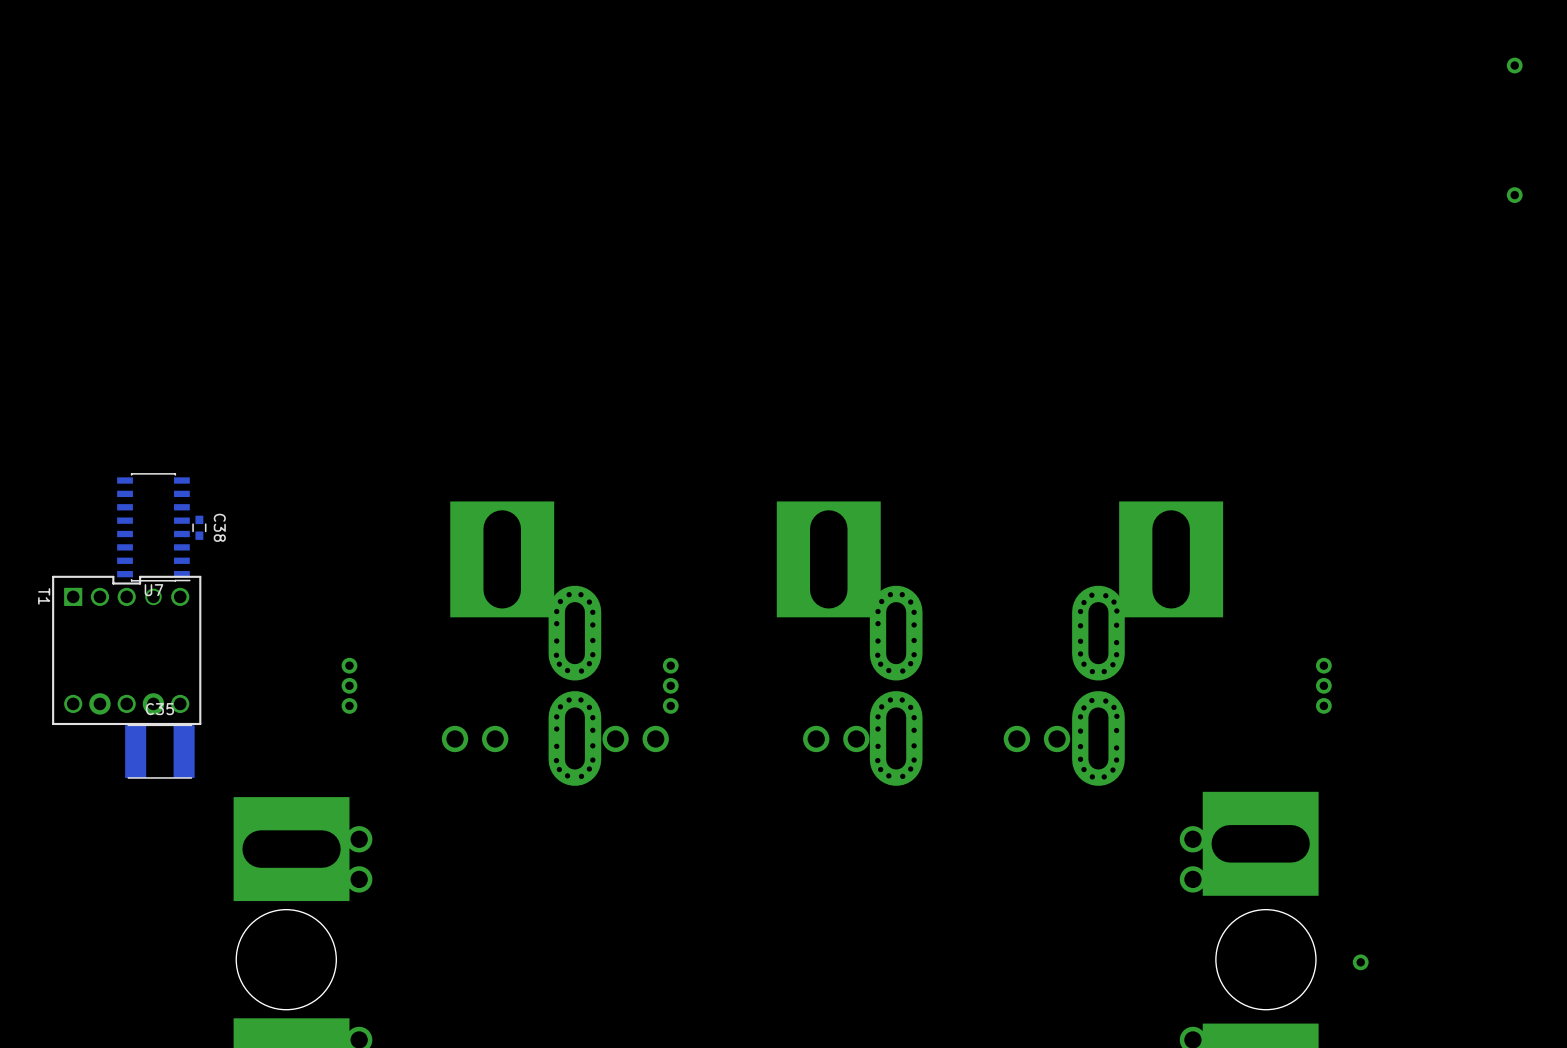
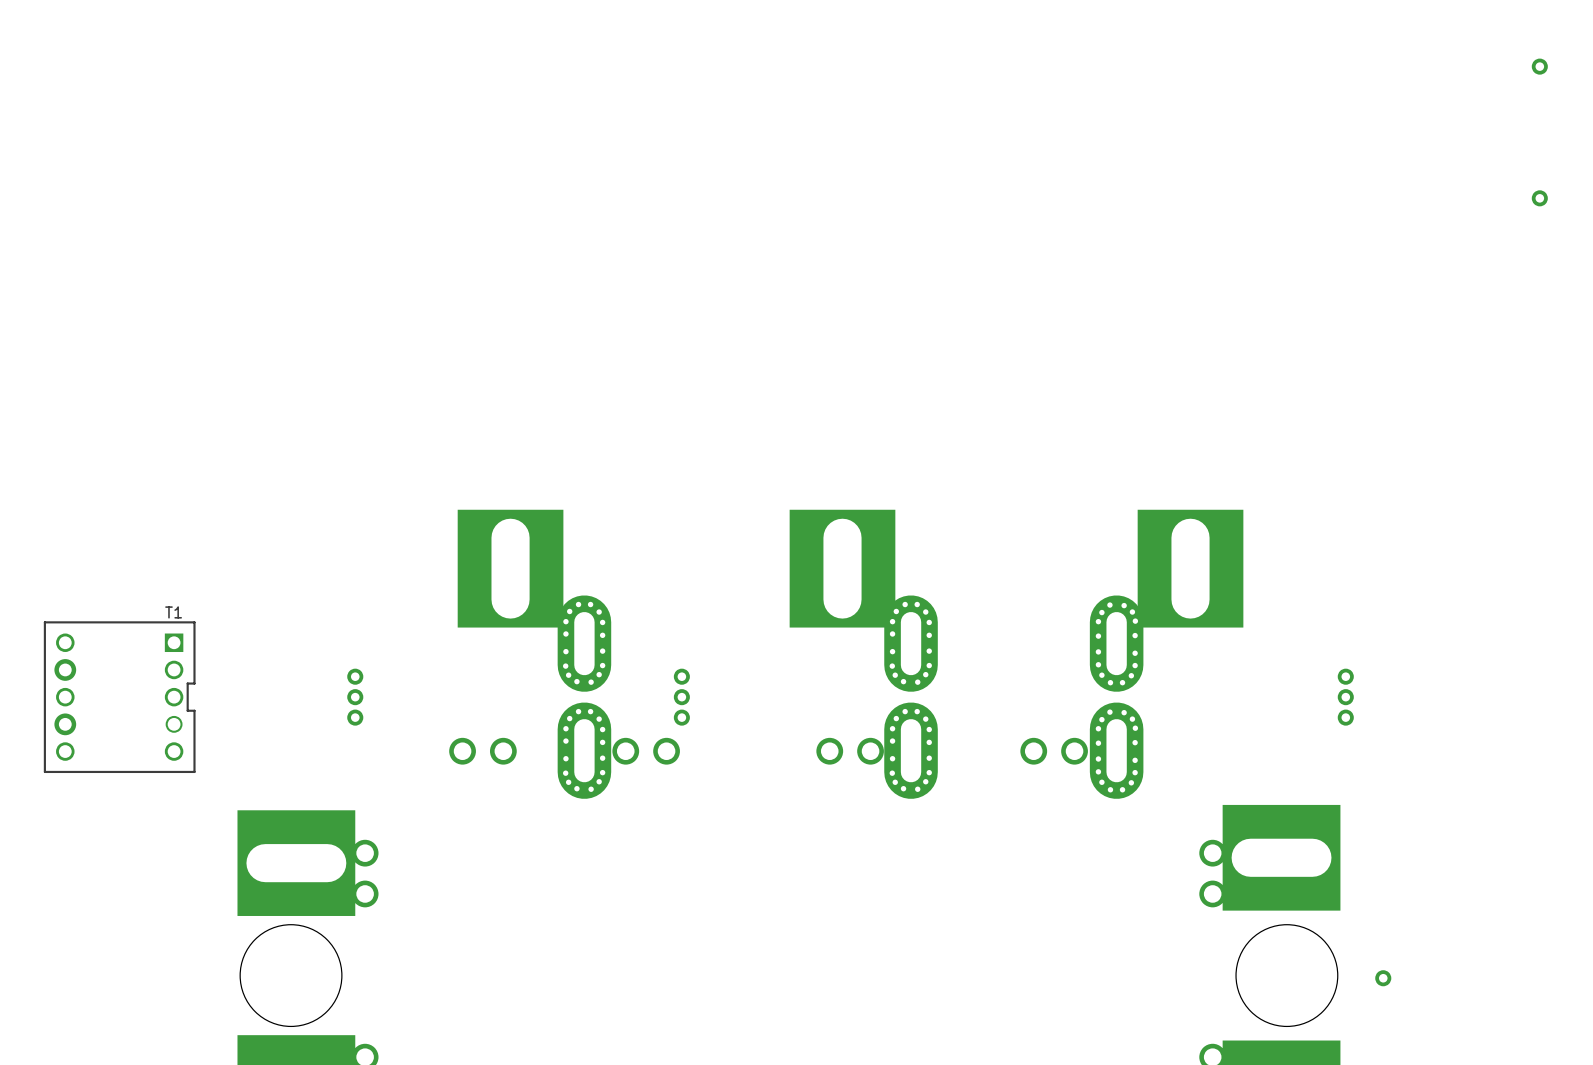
U7: (153, 527) -> none
C38: (199, 527) -> none
T1 rotation: 0° (126, 650) -> 90° clockwise (119, 697)
C35: (159, 751) -> none

